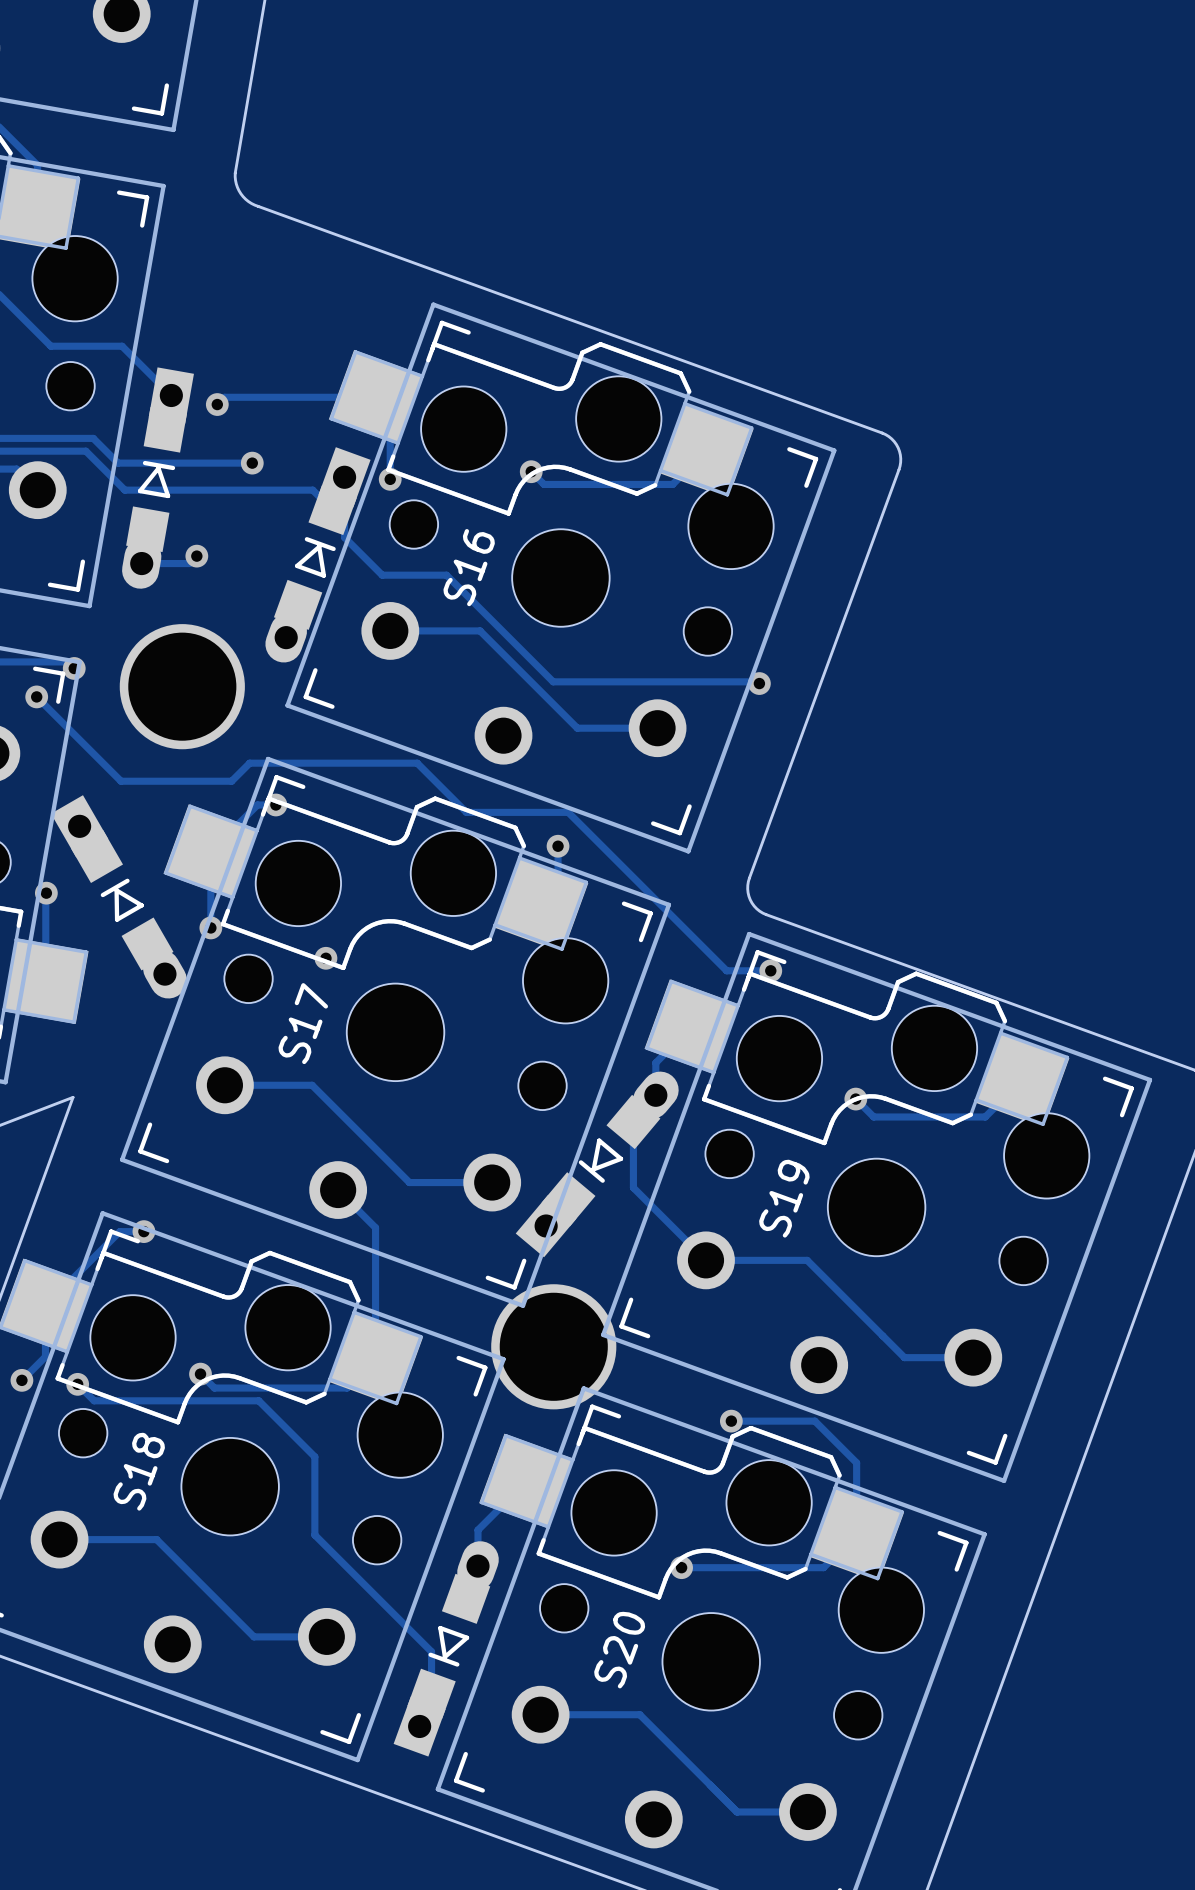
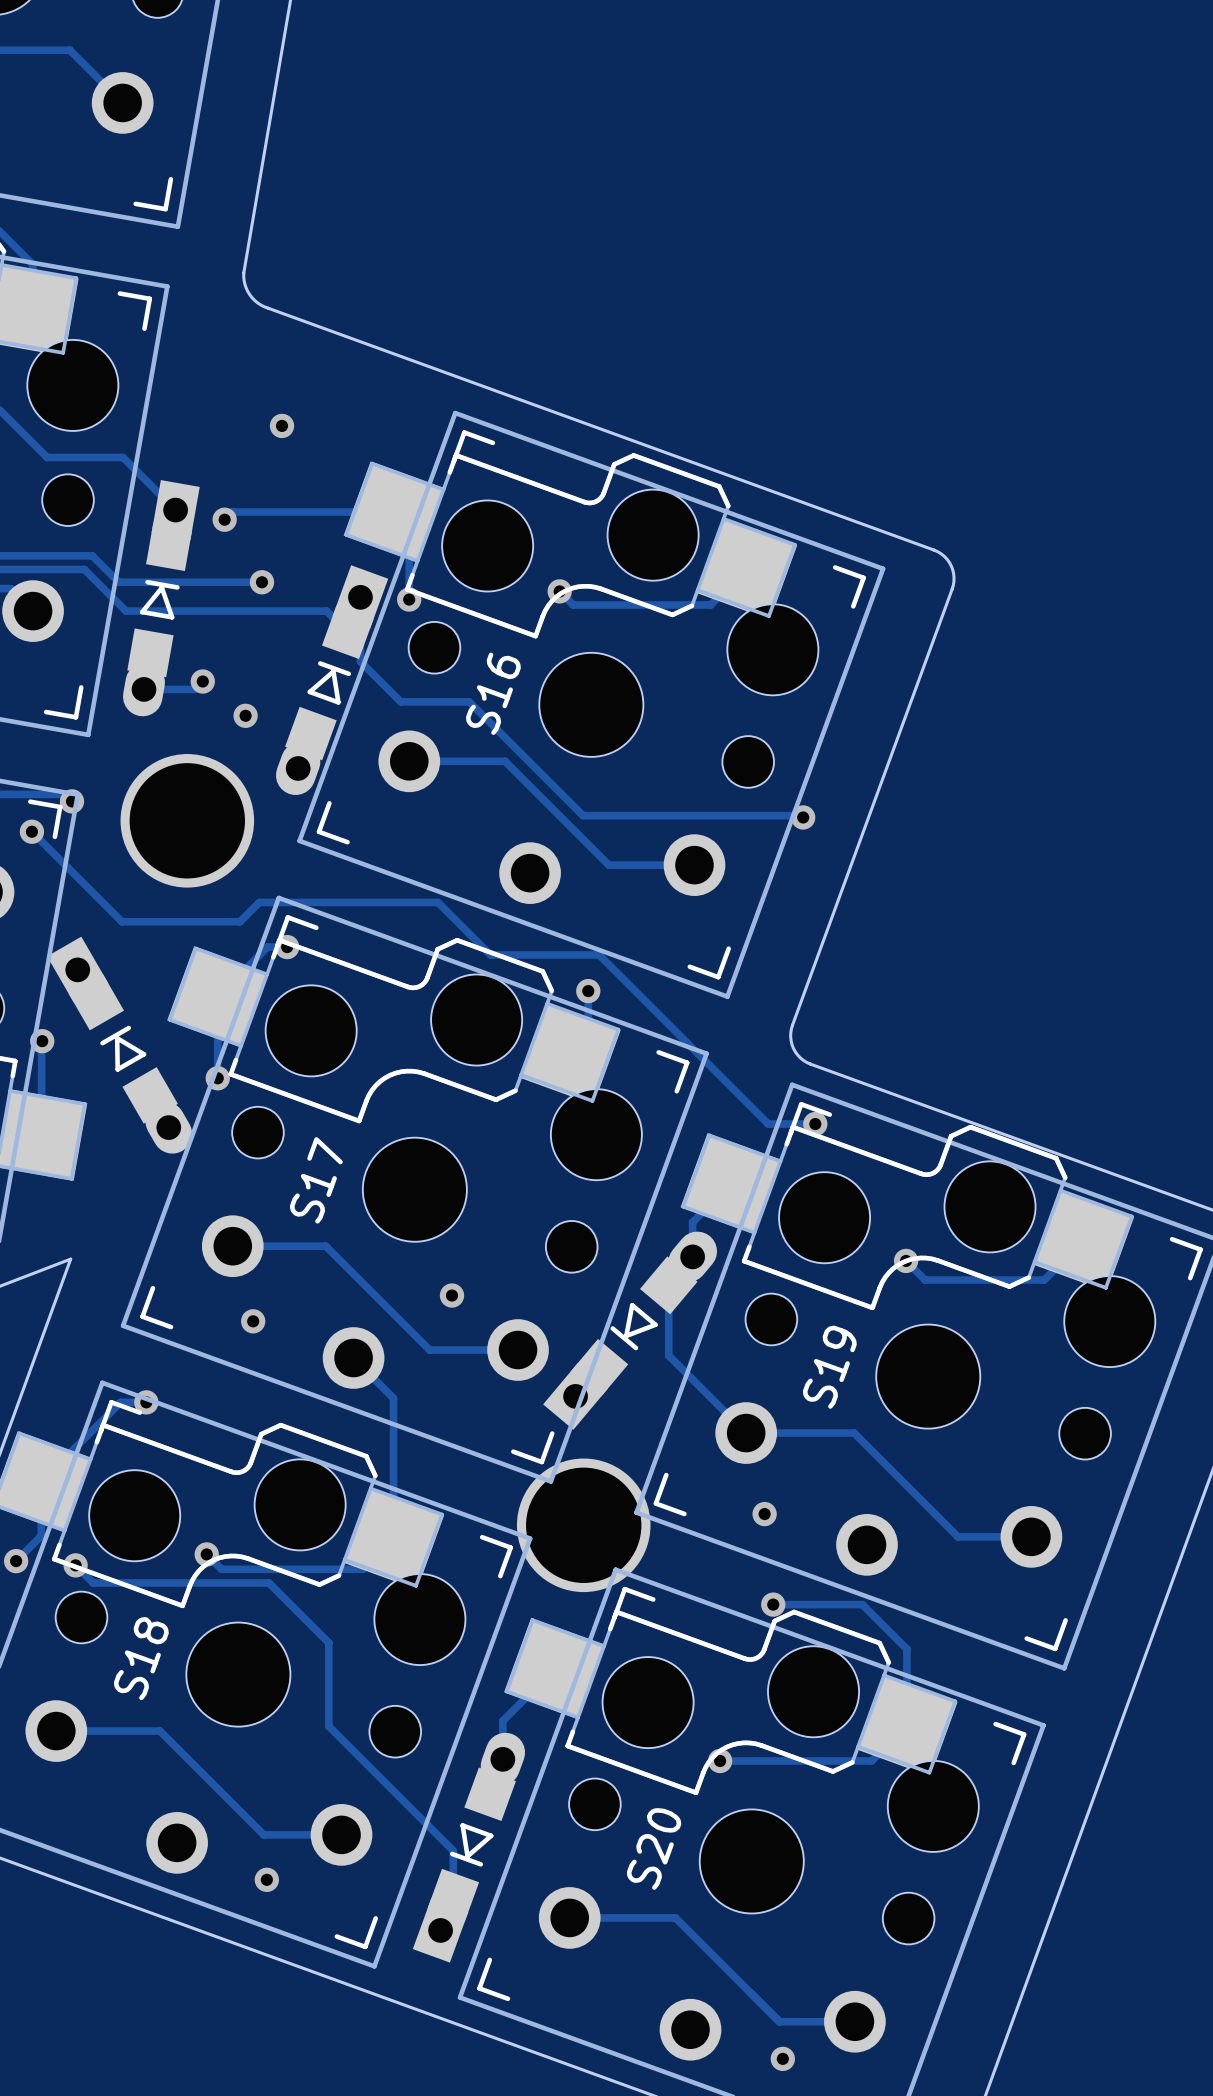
via: none -> (282, 425)
via: none -> (245, 715)
via: (325, 958) -> none
via: none -> (451, 1295)
via: none -> (253, 1321)
via: none -> (764, 1514)
via: none -> (266, 1879)
via: none -> (782, 2058)

